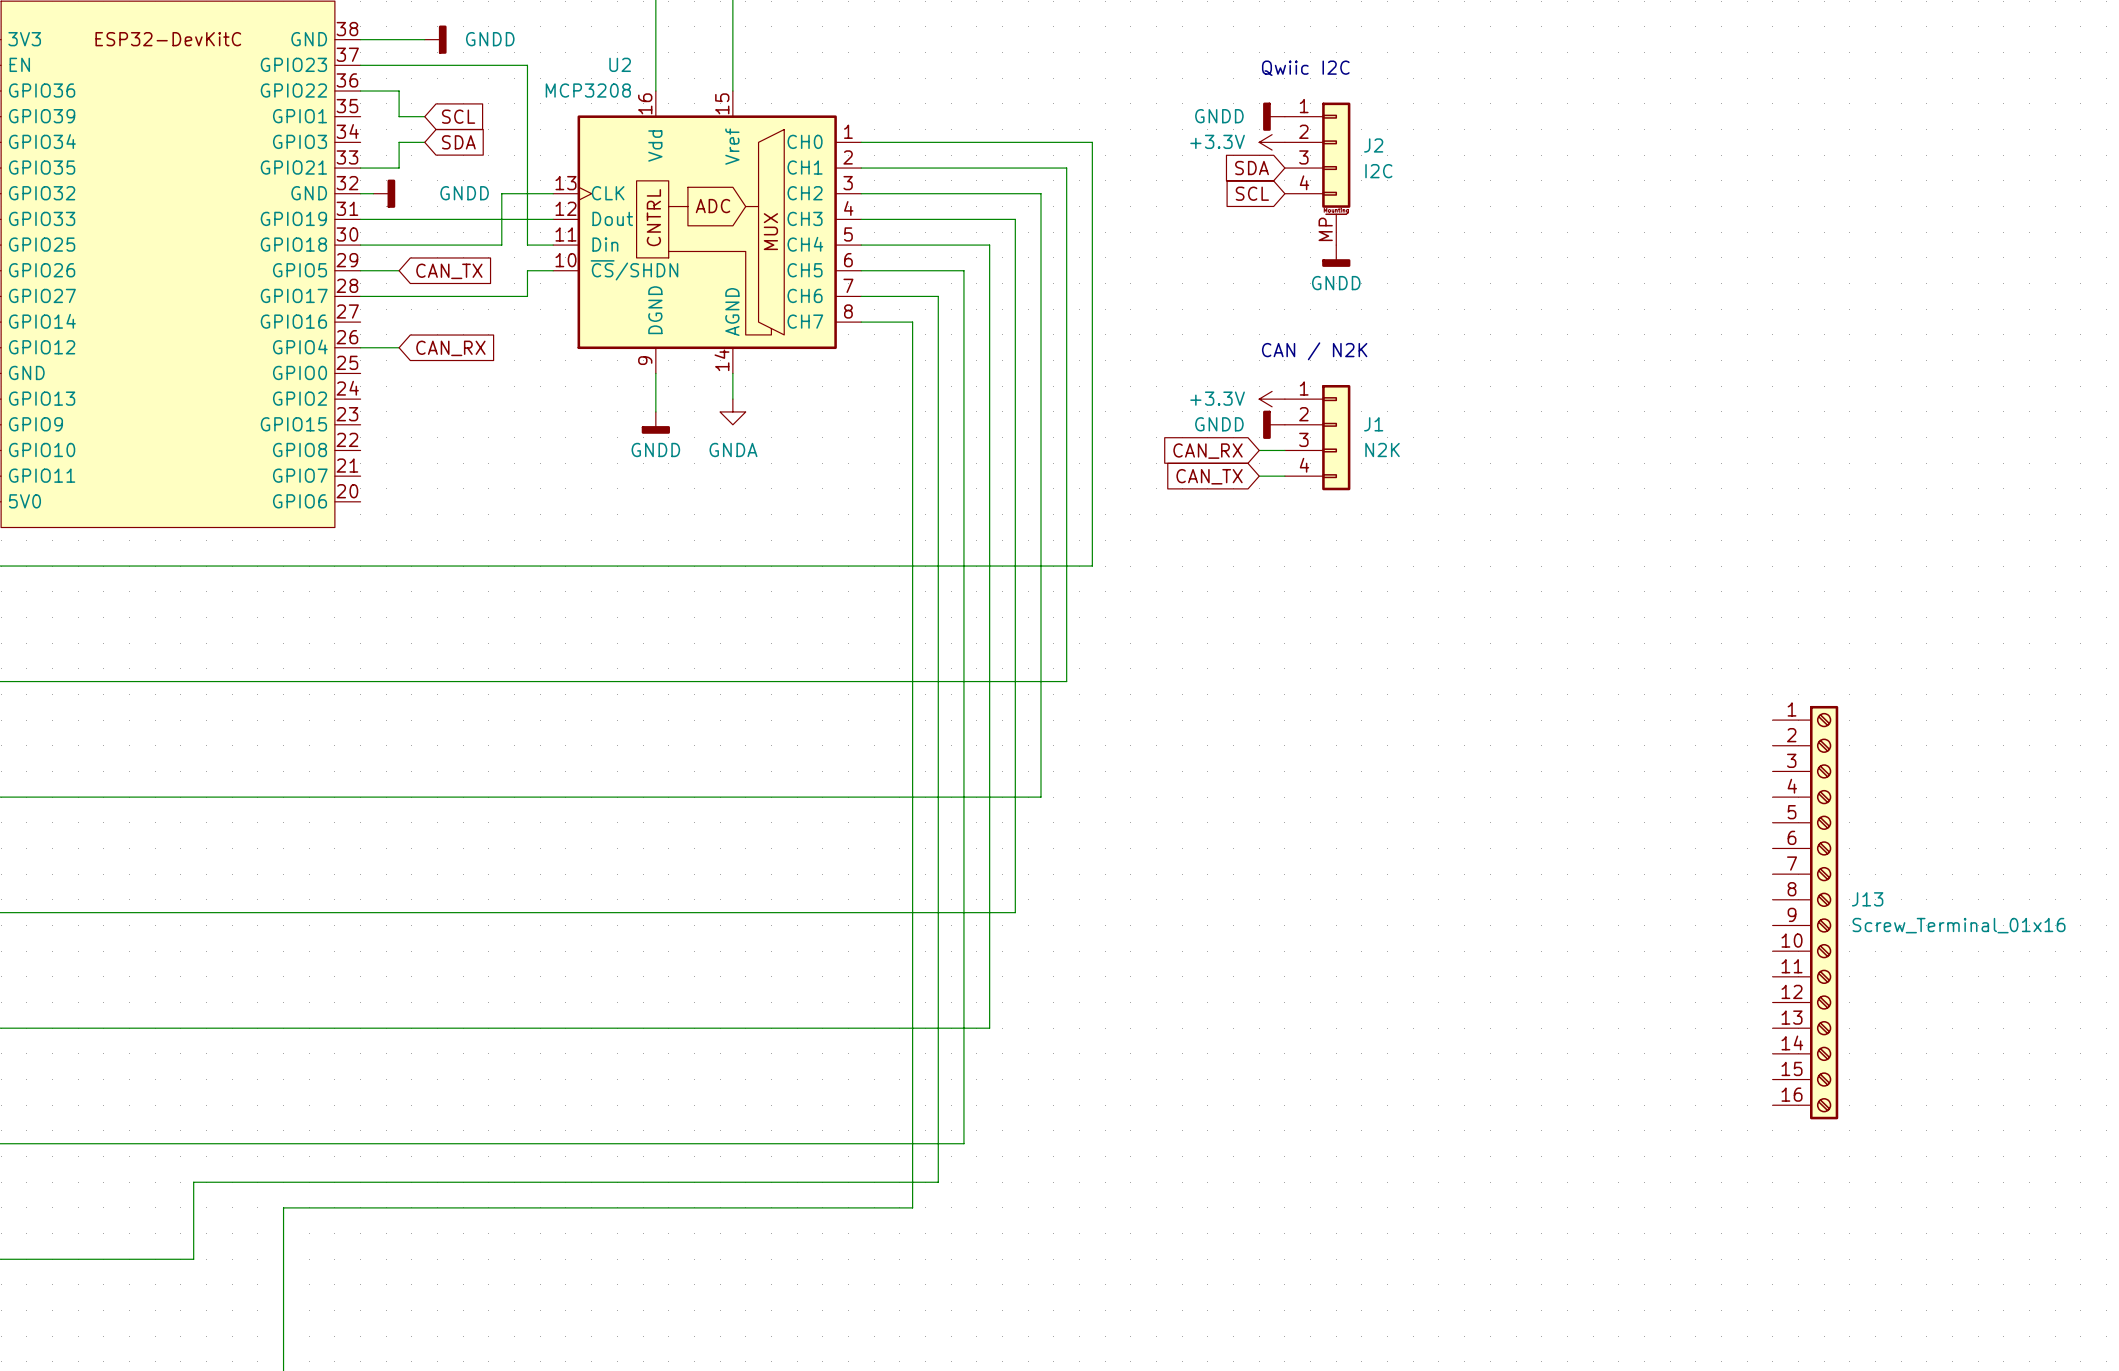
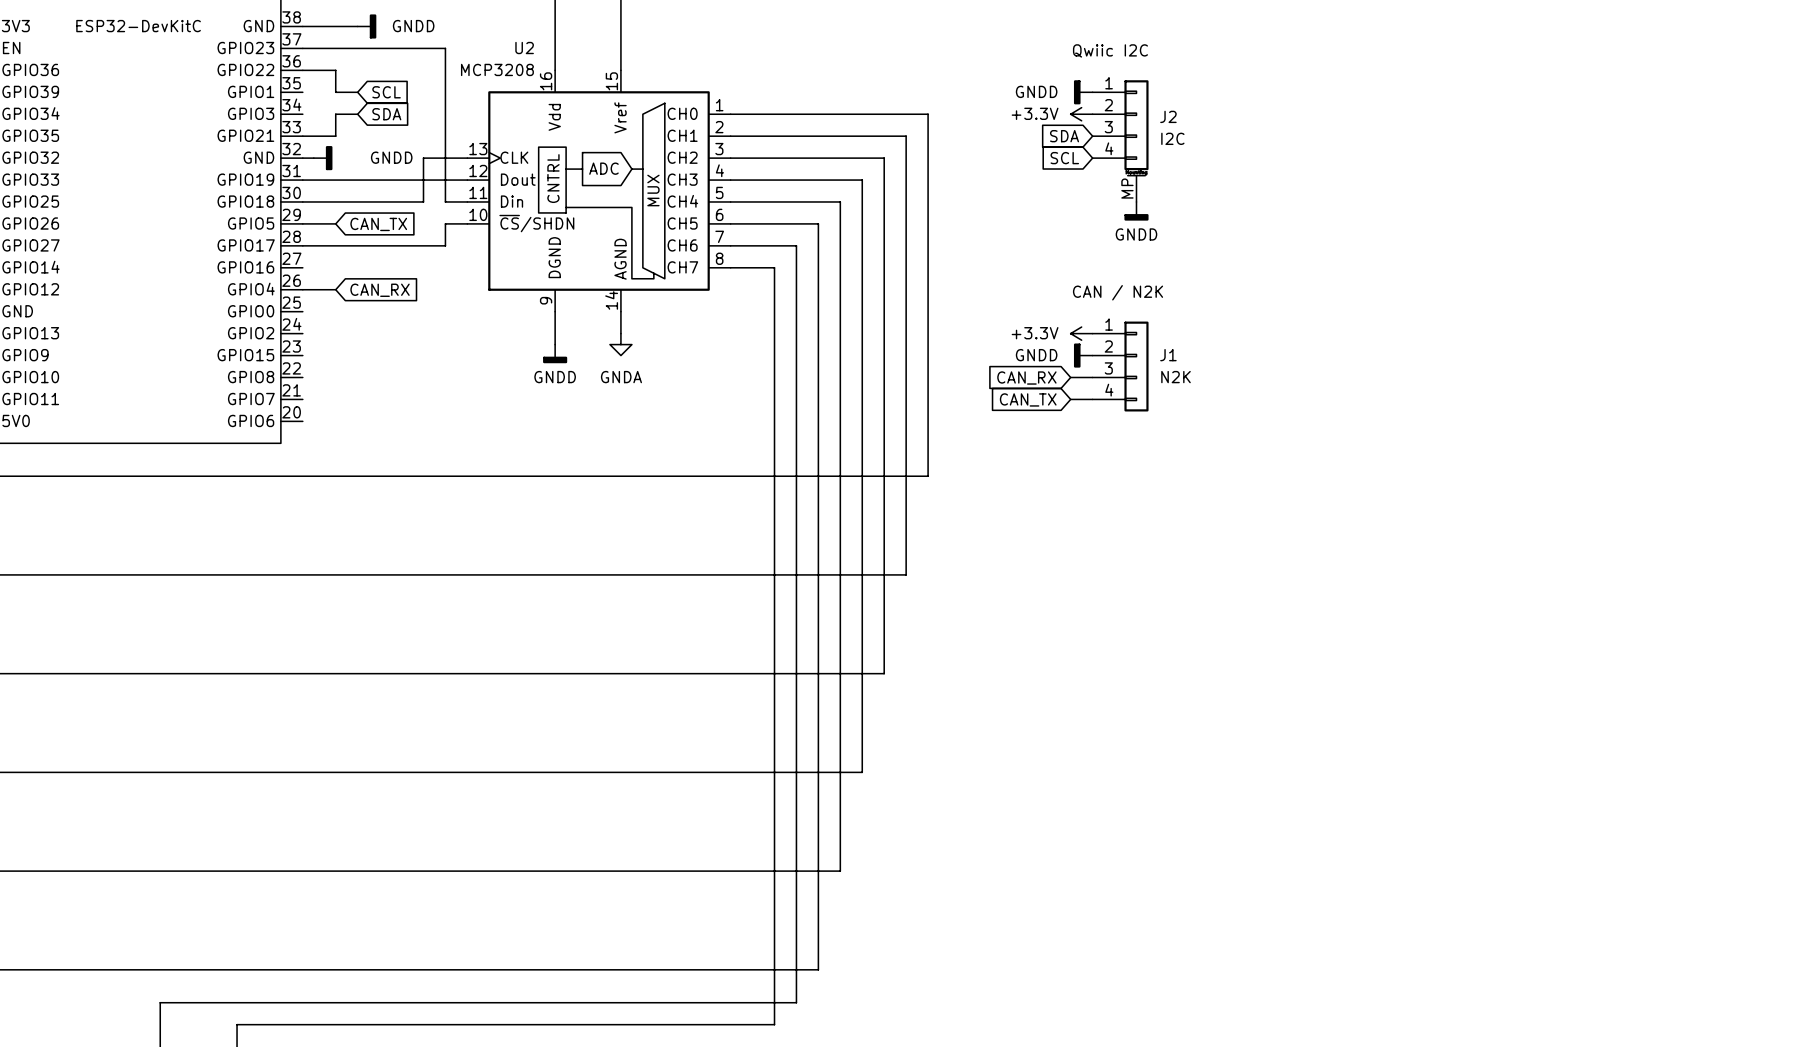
J13: Screw_Terminal_01x16 (1805, 912) -> none

